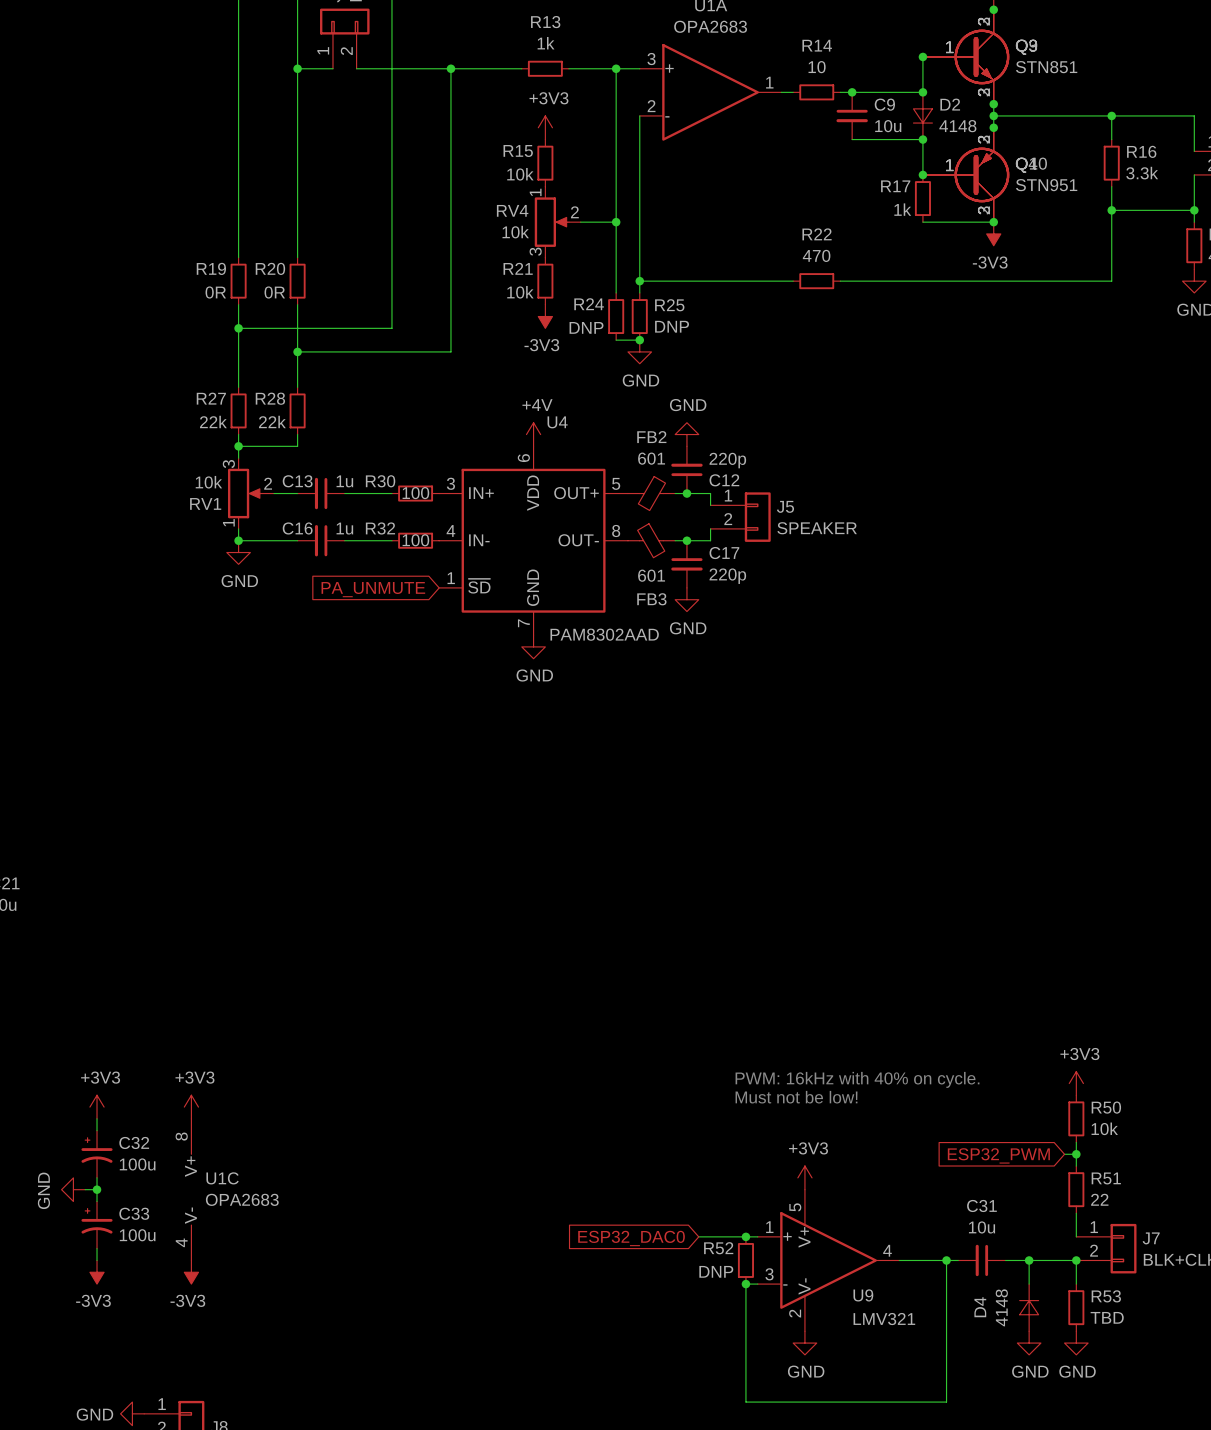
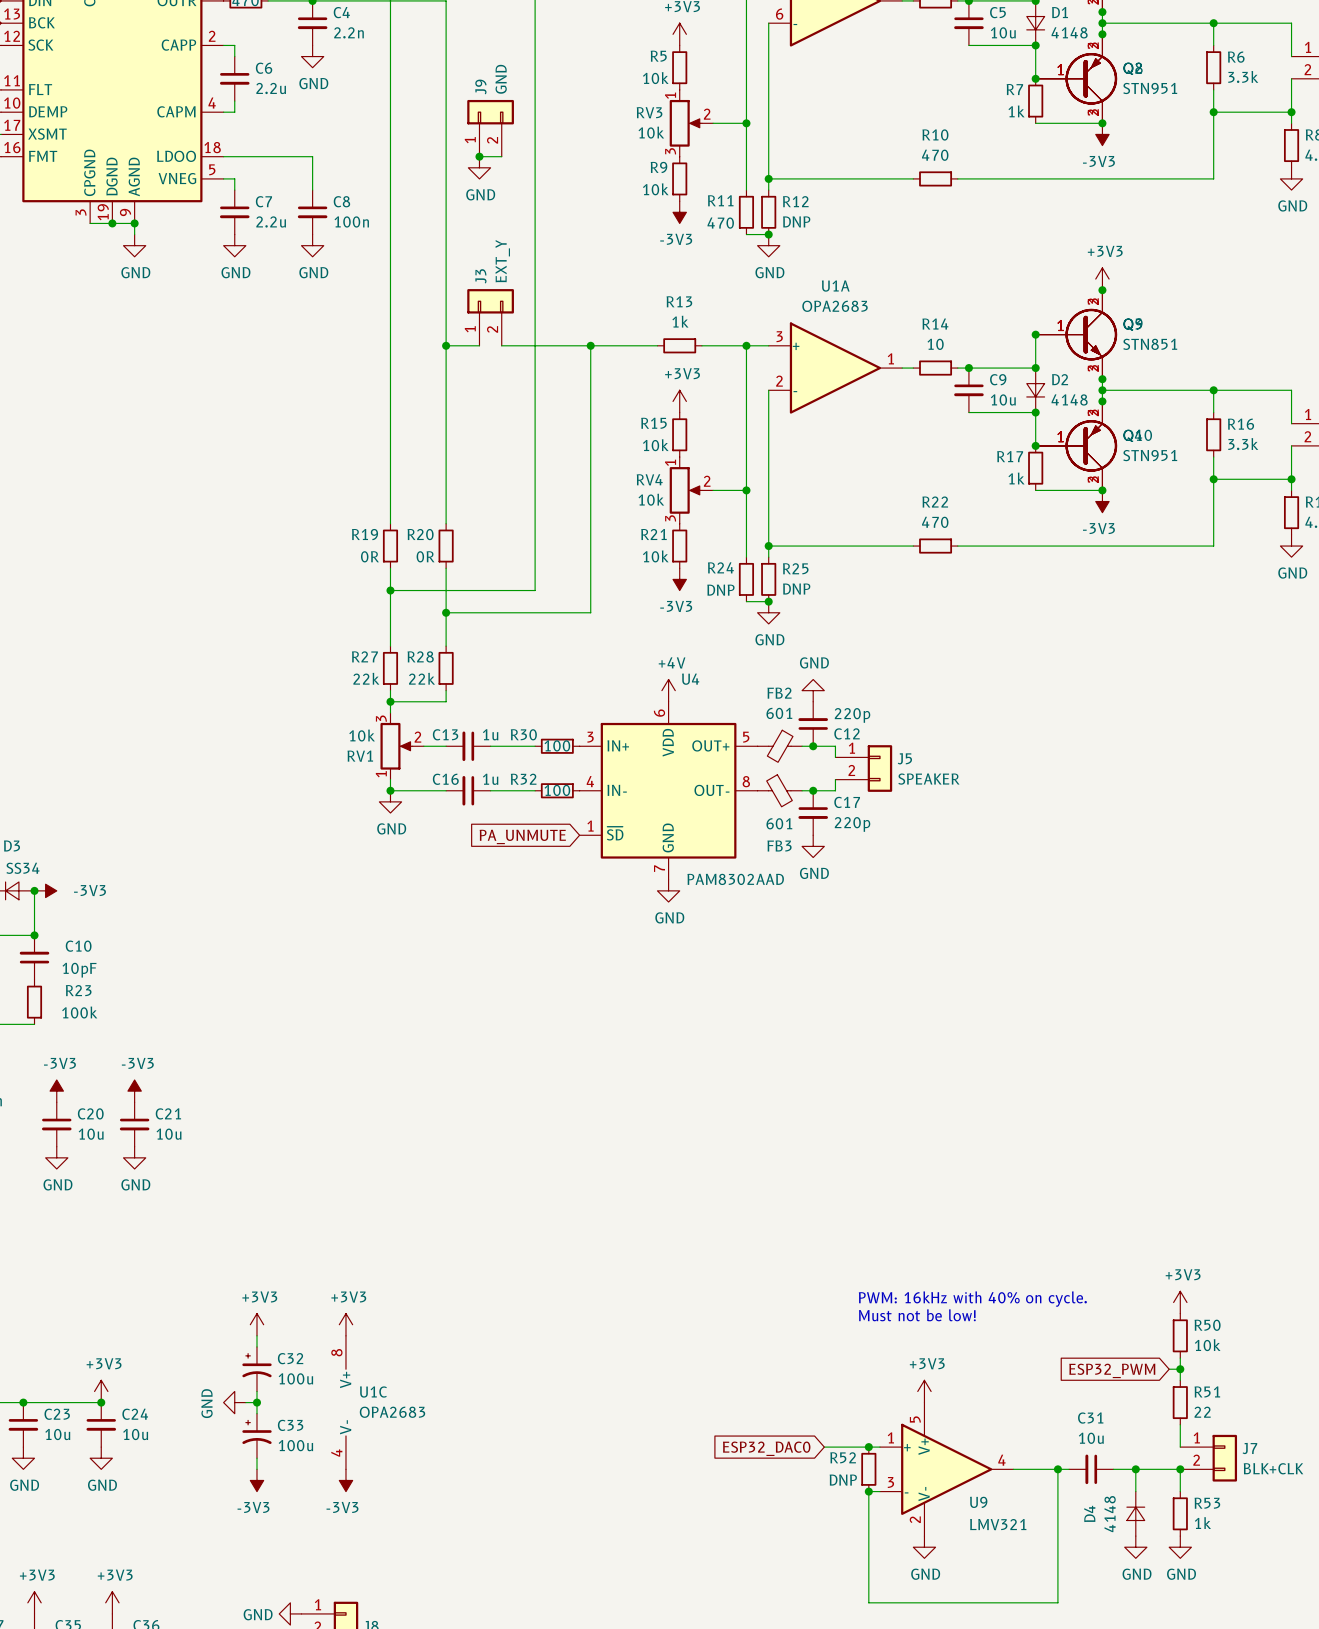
R53 value: TBD (1107, 1317) -> 1k (1202, 1523)

